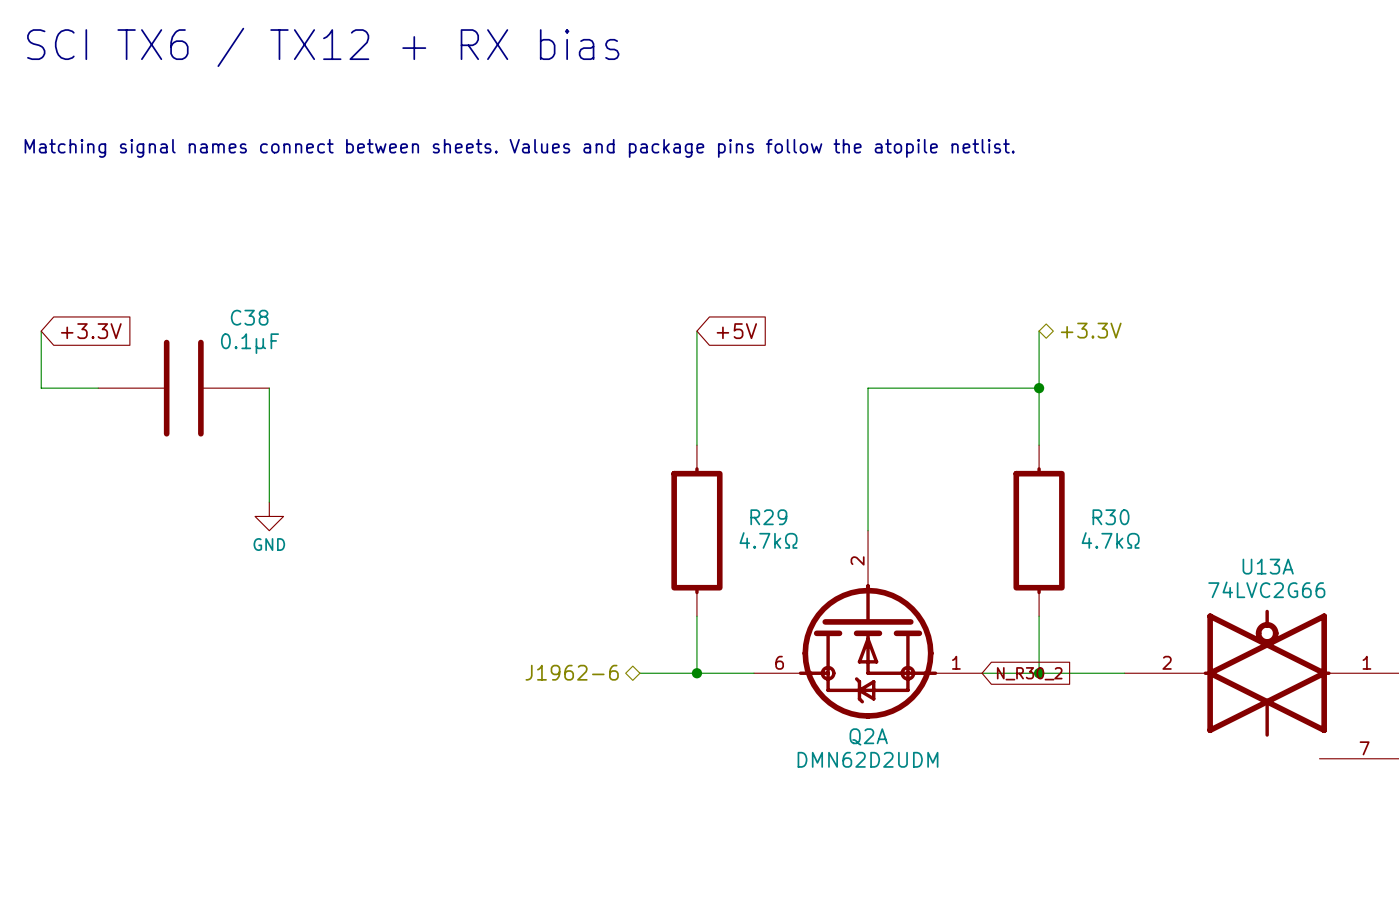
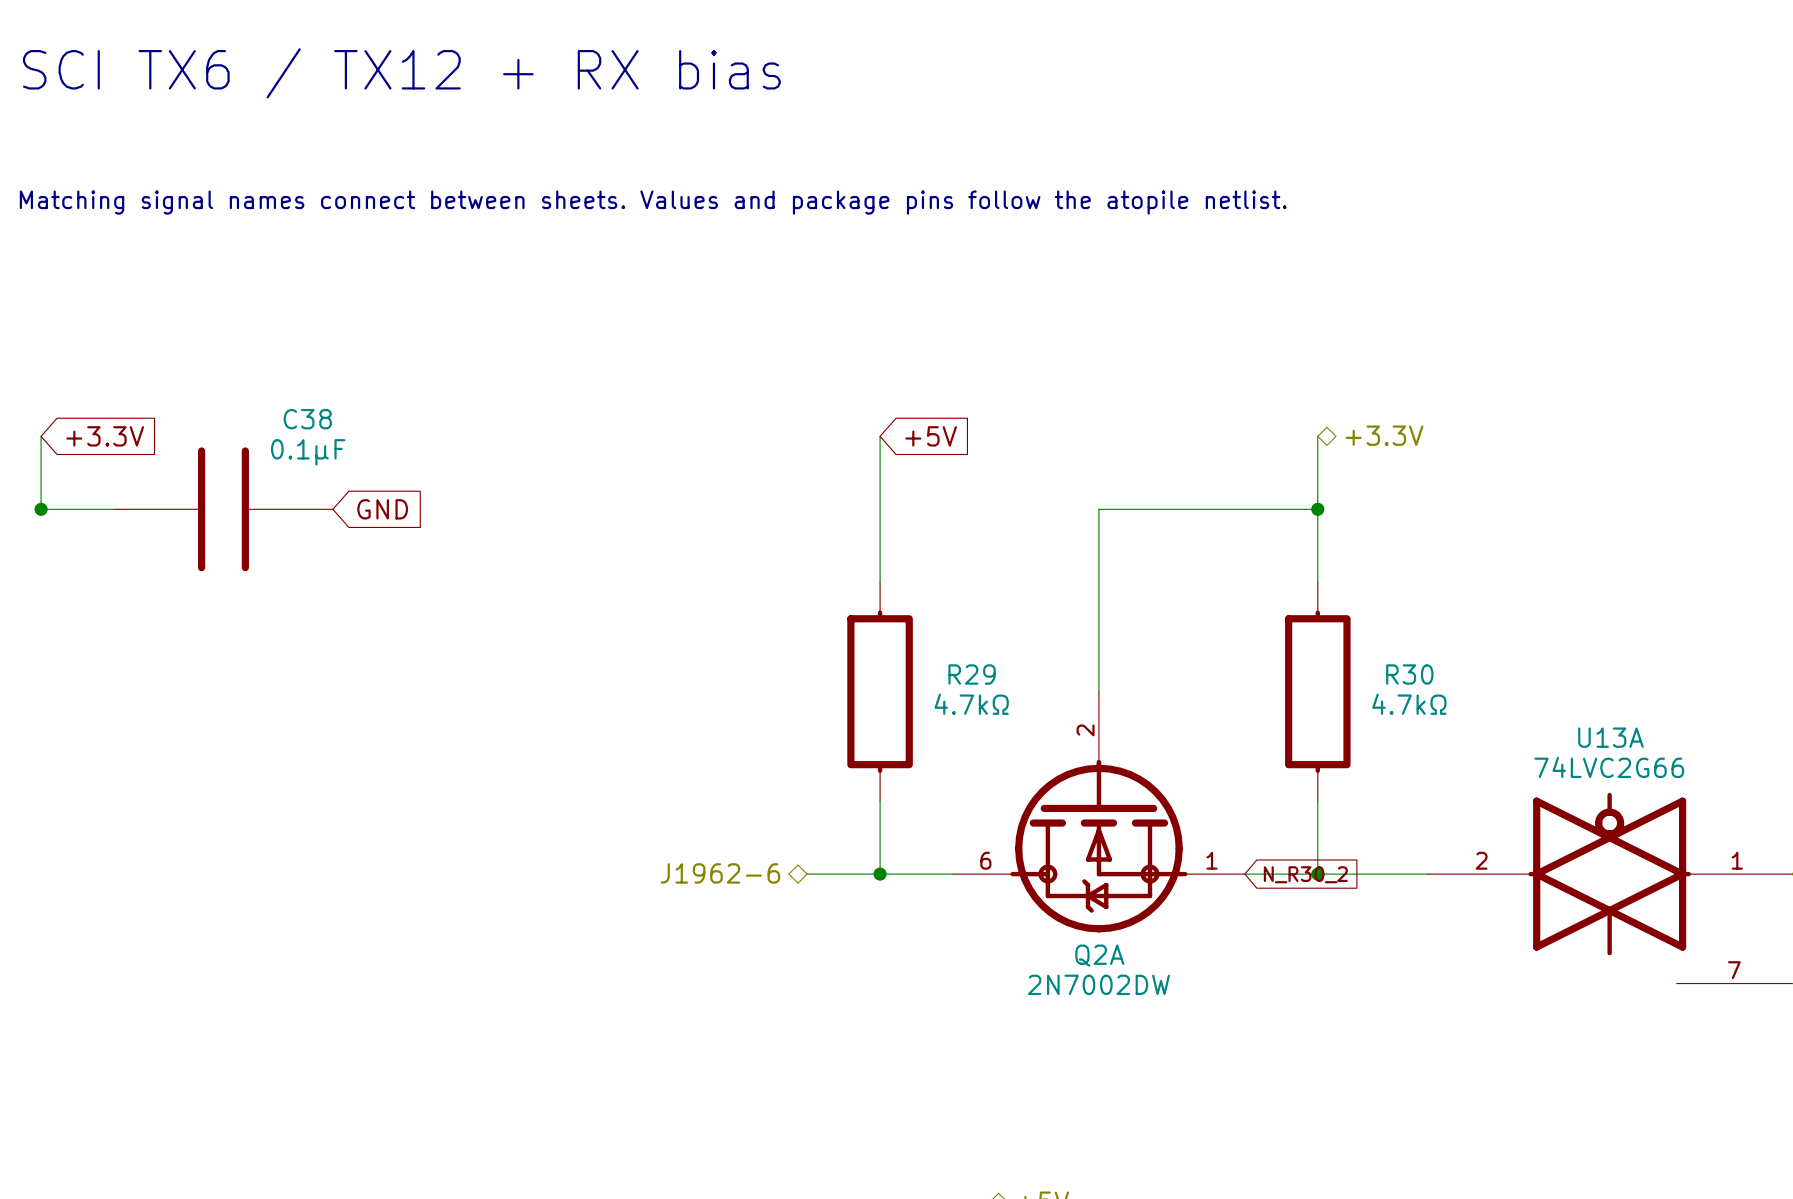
junction: none -> (41, 509)
wire: (269, 388) (269, 502) -> none
global label: none -> GND (382, 509)
power symbol: GND (269, 516) -> none
Q2A value: DMN62D2UDM (868, 759) -> 2N7002DW (1098, 984)

